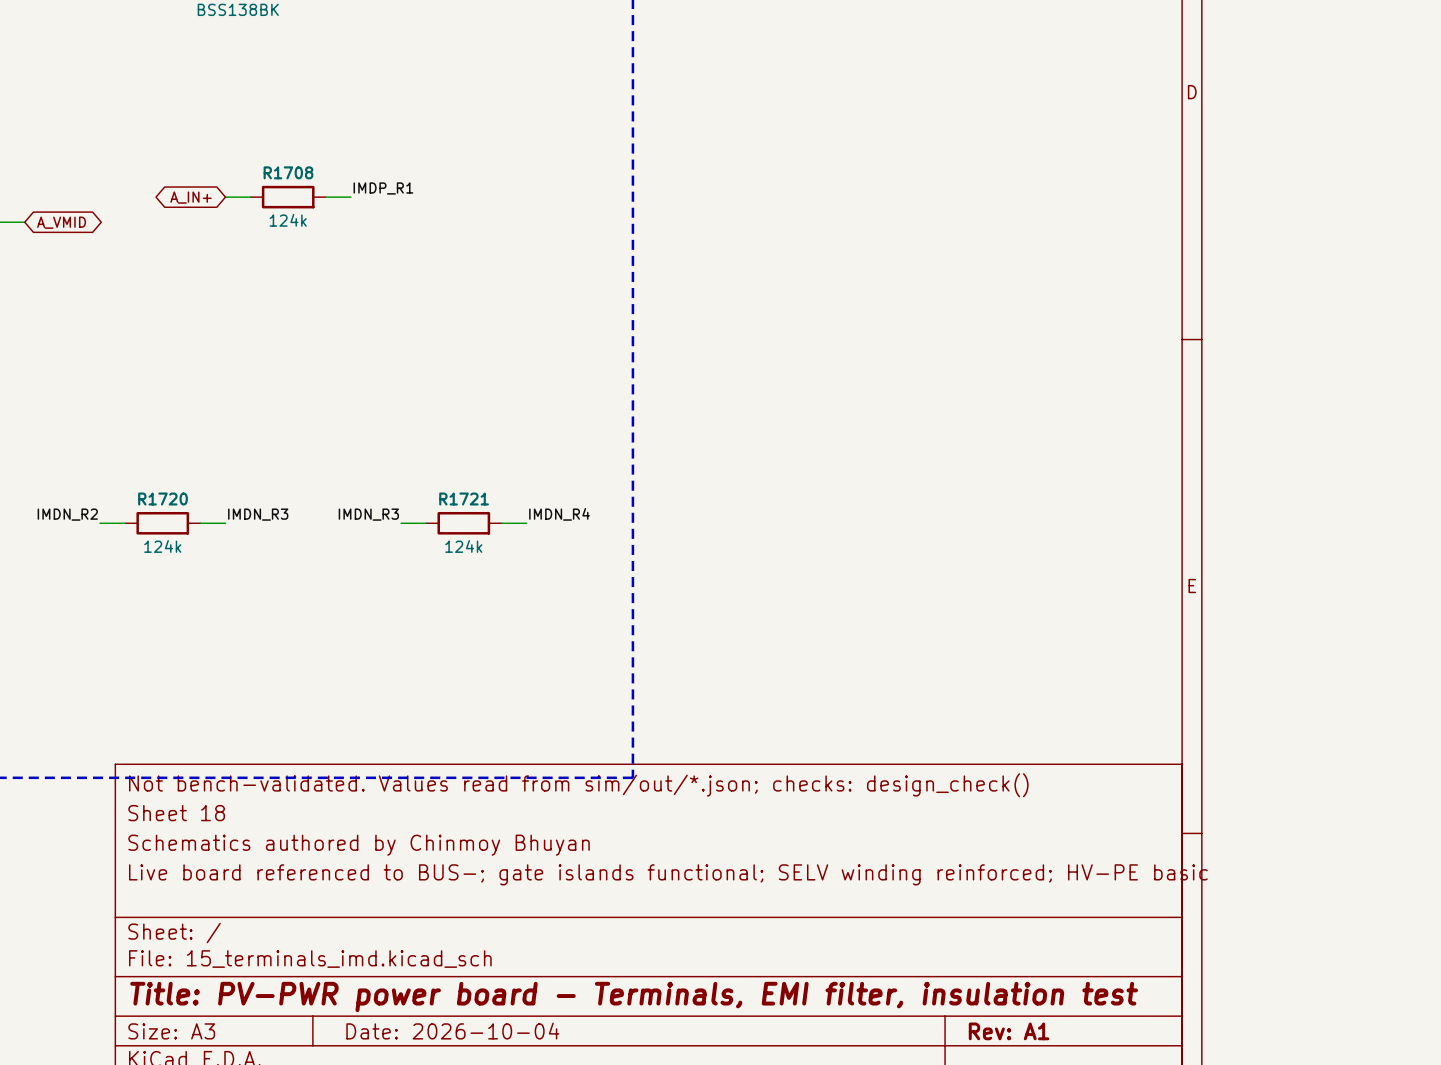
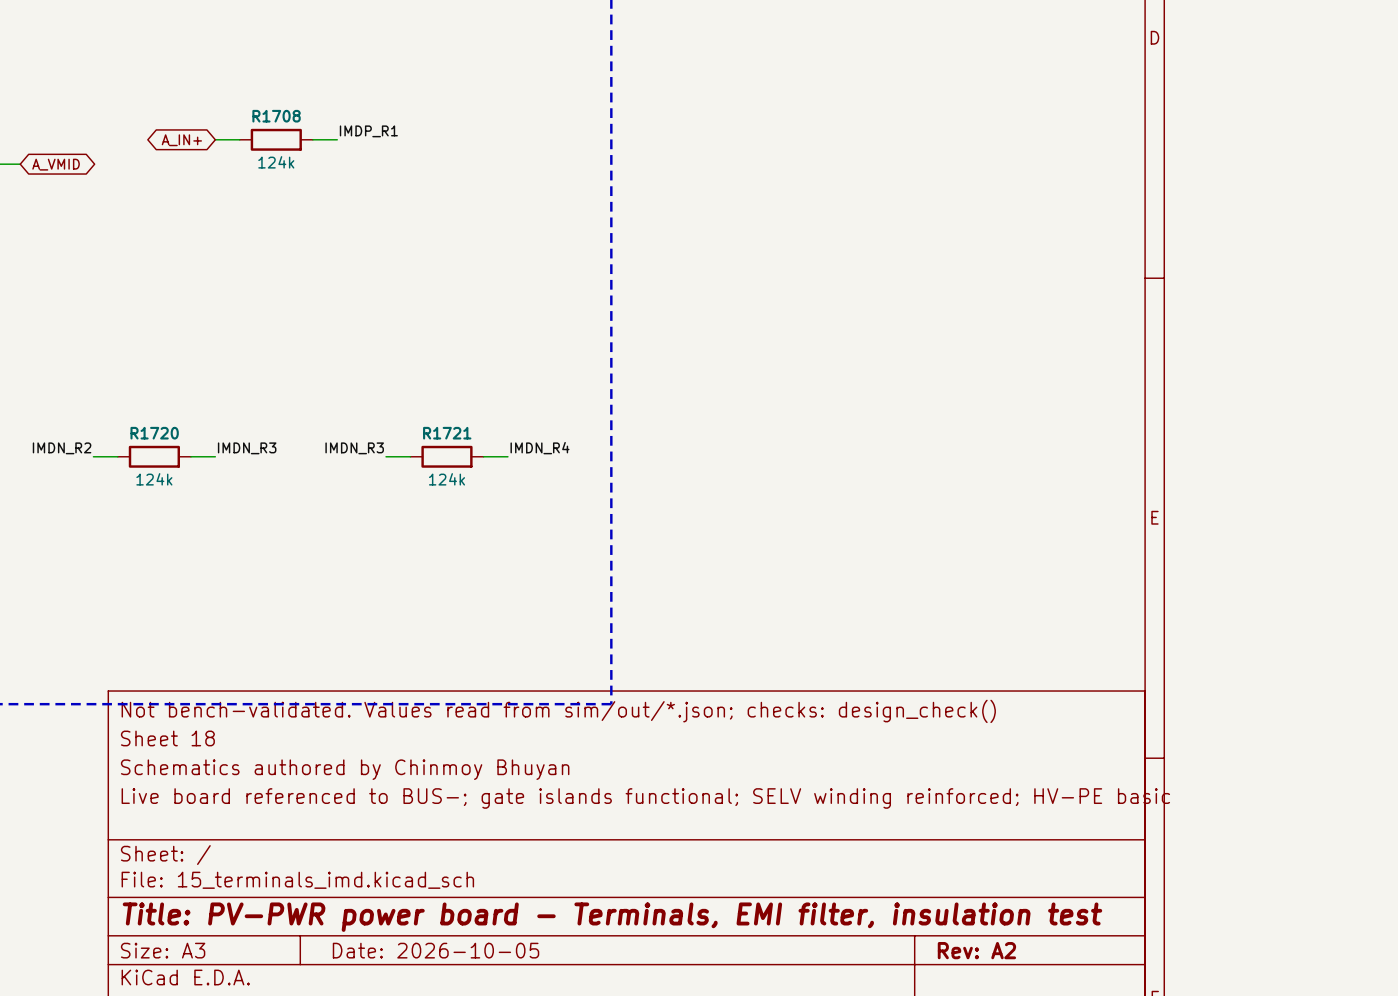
title block: Date: 2026-10-04 (452, 1031) -> Date: 2026-10-05 (436, 950)
title block: Rev: A1 (1009, 1031) -> Rev: A2 (976, 950)

